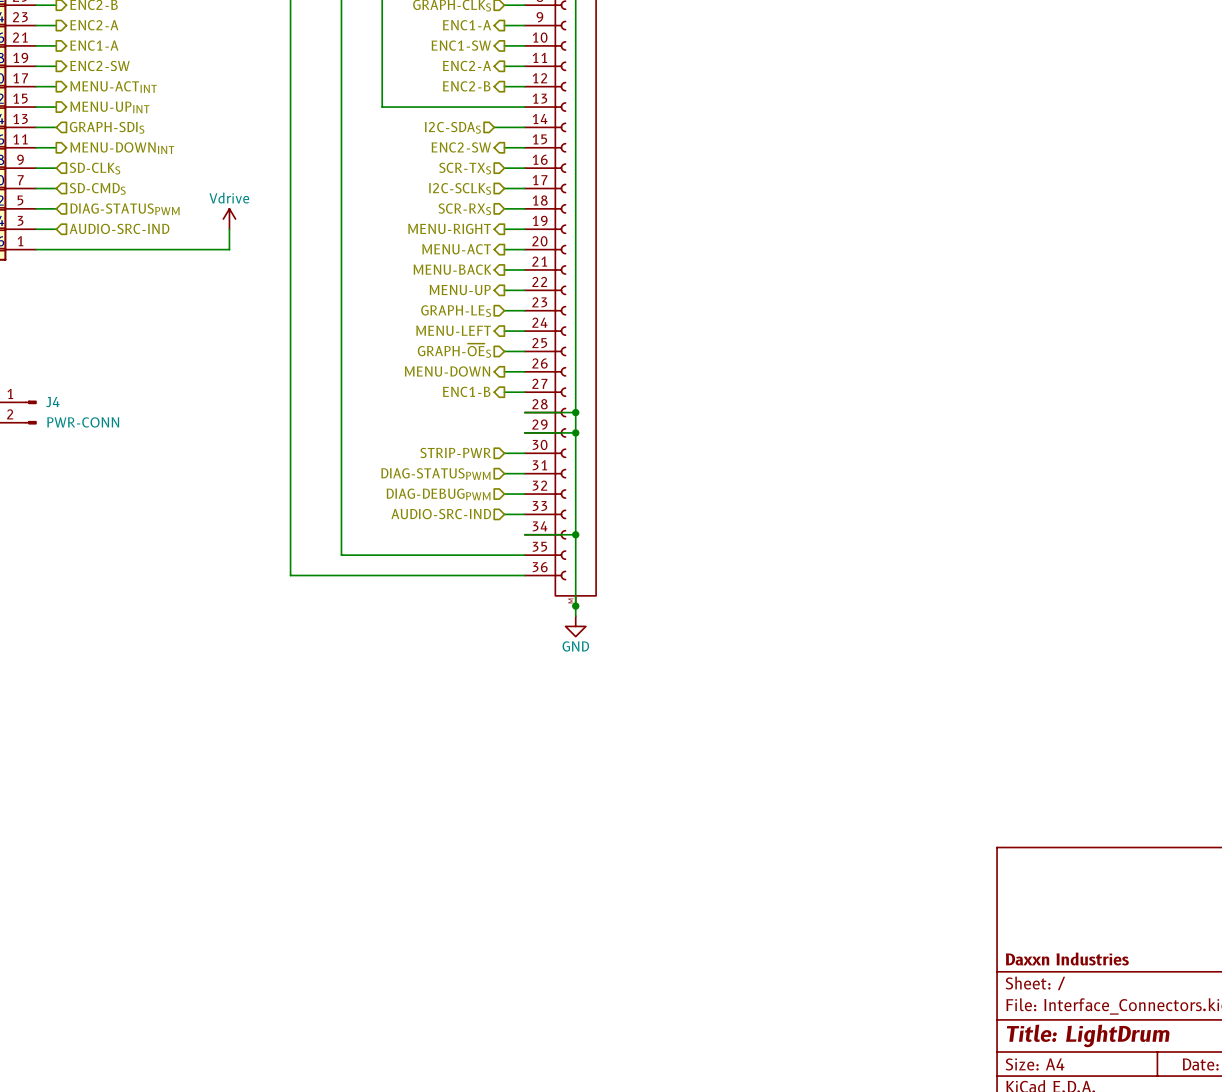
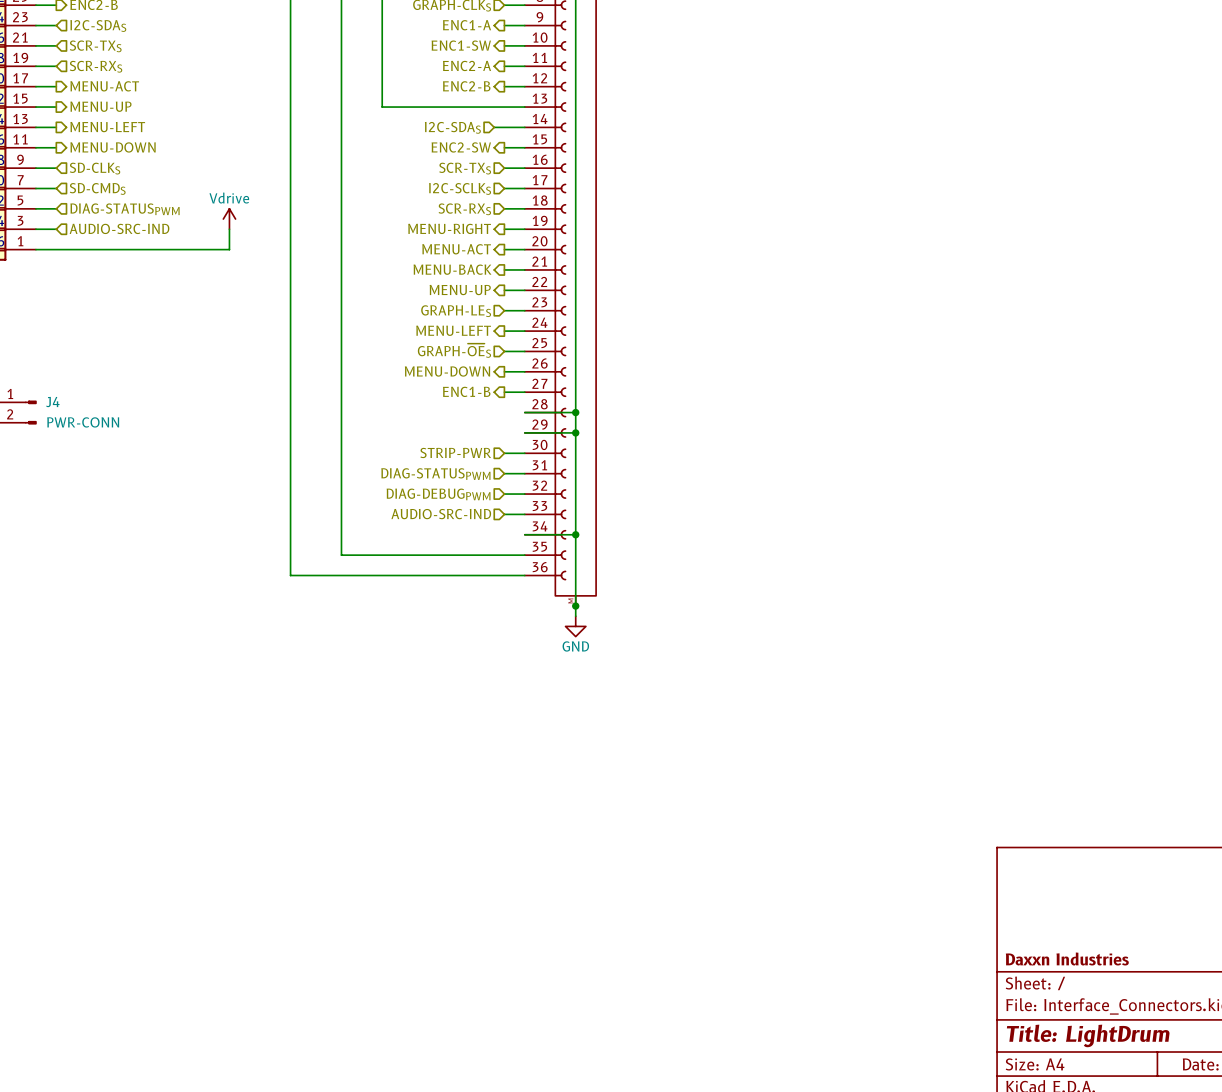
hierarchical label shape: output (94, 25) -> input (98, 25)
hierarchical label: ENC2-A (94, 25) -> I2C-SDAS (98, 25)
hierarchical label shape: output (94, 45) -> input (95, 46)
hierarchical label: ENC1-A (94, 45) -> SCR-TXS (95, 46)
hierarchical label shape: output (99, 65) -> input (96, 66)
hierarchical label: ENC2-SW (99, 65) -> SCR-RXS (96, 66)
hierarchical label: MENU-ACTINT (113, 87) -> MENU-ACT (104, 86)
hierarchical label: MENU-UPINT (109, 107) -> MENU-UP (100, 106)
hierarchical label shape: input (107, 127) -> output (107, 127)
hierarchical label: GRAPH-SDIS (107, 127) -> MENU-LEFT (107, 127)
hierarchical label: MENU-DOWNINT (122, 148) -> MENU-DOWN (113, 147)

